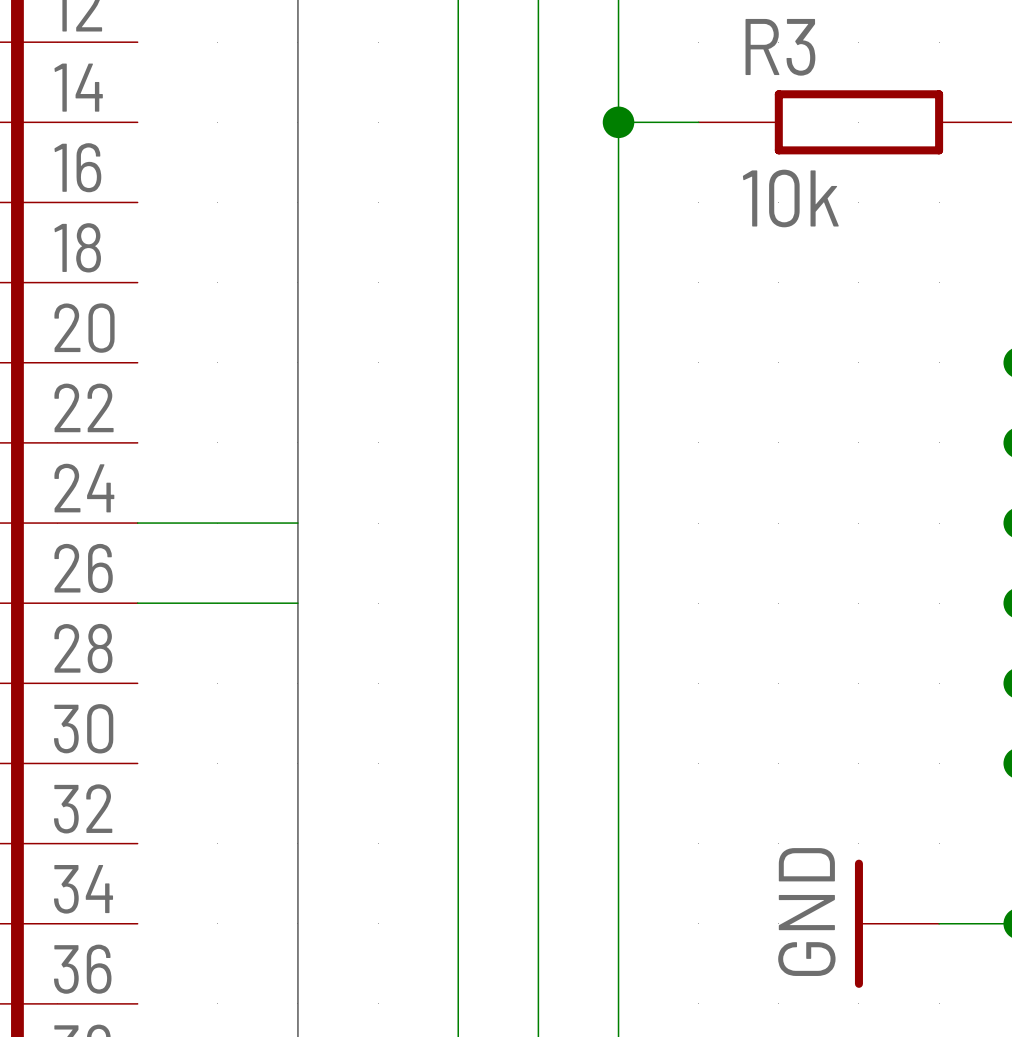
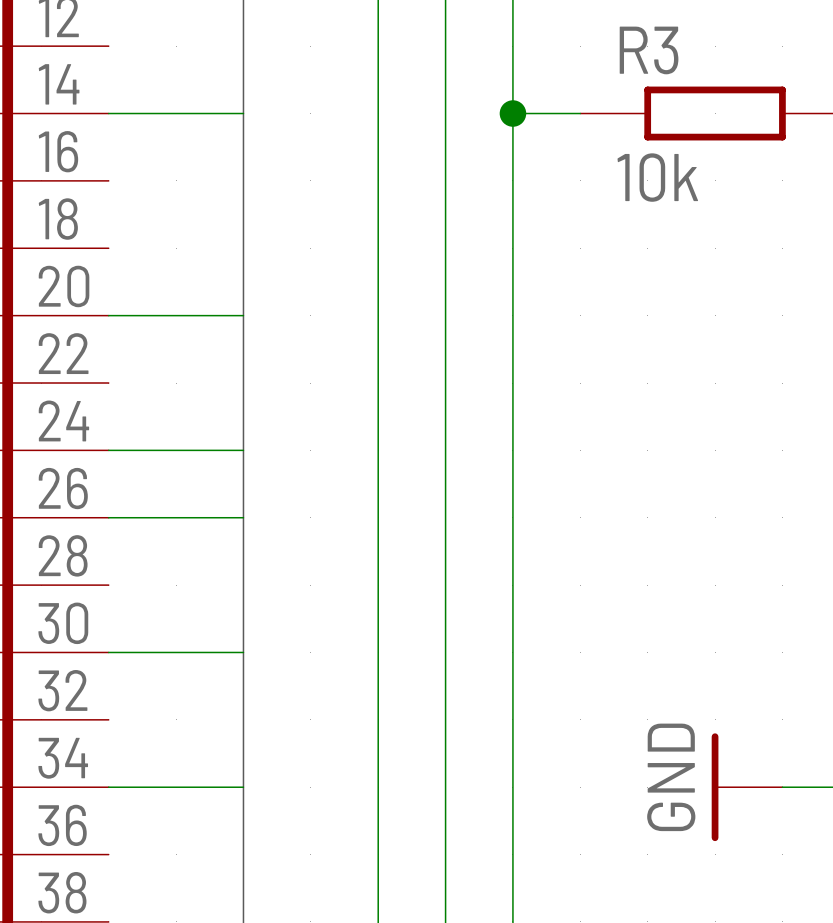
wire: none -> (108, 113) (243, 113)
wire: none -> (108, 315) (243, 315)
wire: none -> (108, 652) (243, 652)
wire: none -> (108, 787) (243, 787)

